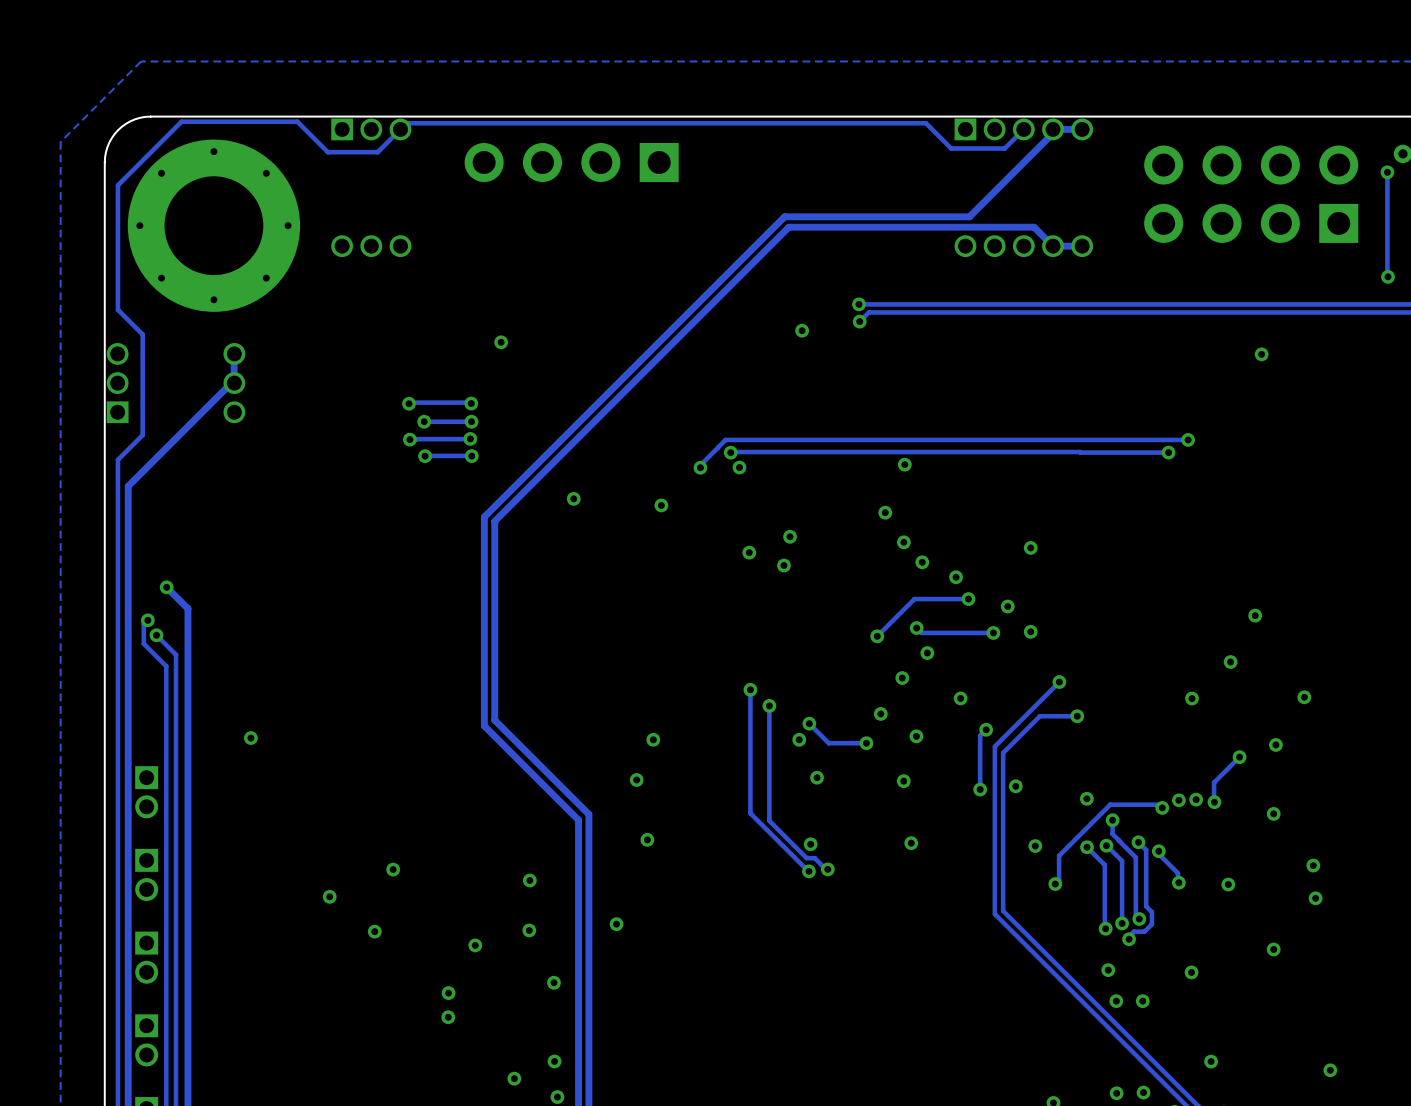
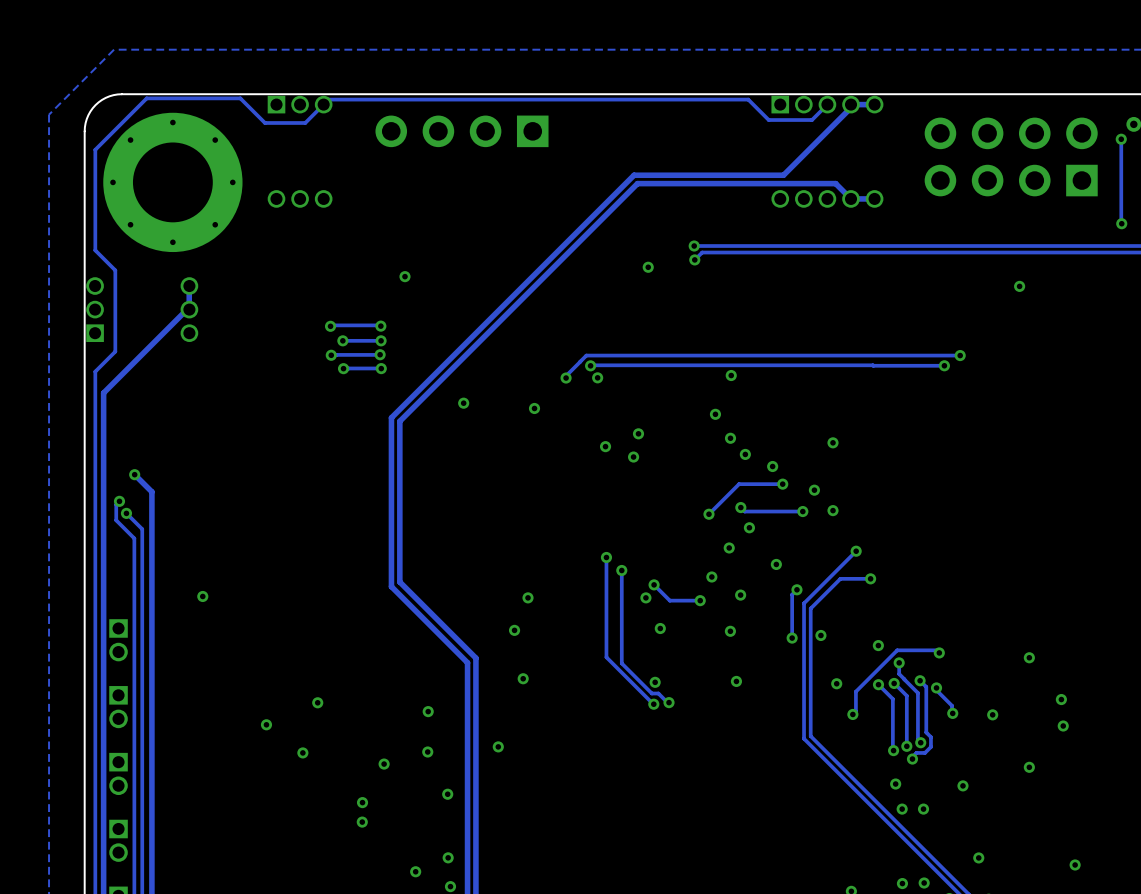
via: (1255, 615) -> none
via: (1230, 662) -> none
via: (1304, 697) -> none
via: (1192, 698) -> none
via: (1275, 744) -> none
track: (1239, 757) (1214, 782) (1214, 802) -> none
via: (1239, 757) -> none
via: (1196, 799) -> none
via: (1178, 800) -> none
via: (1214, 802) -> none

